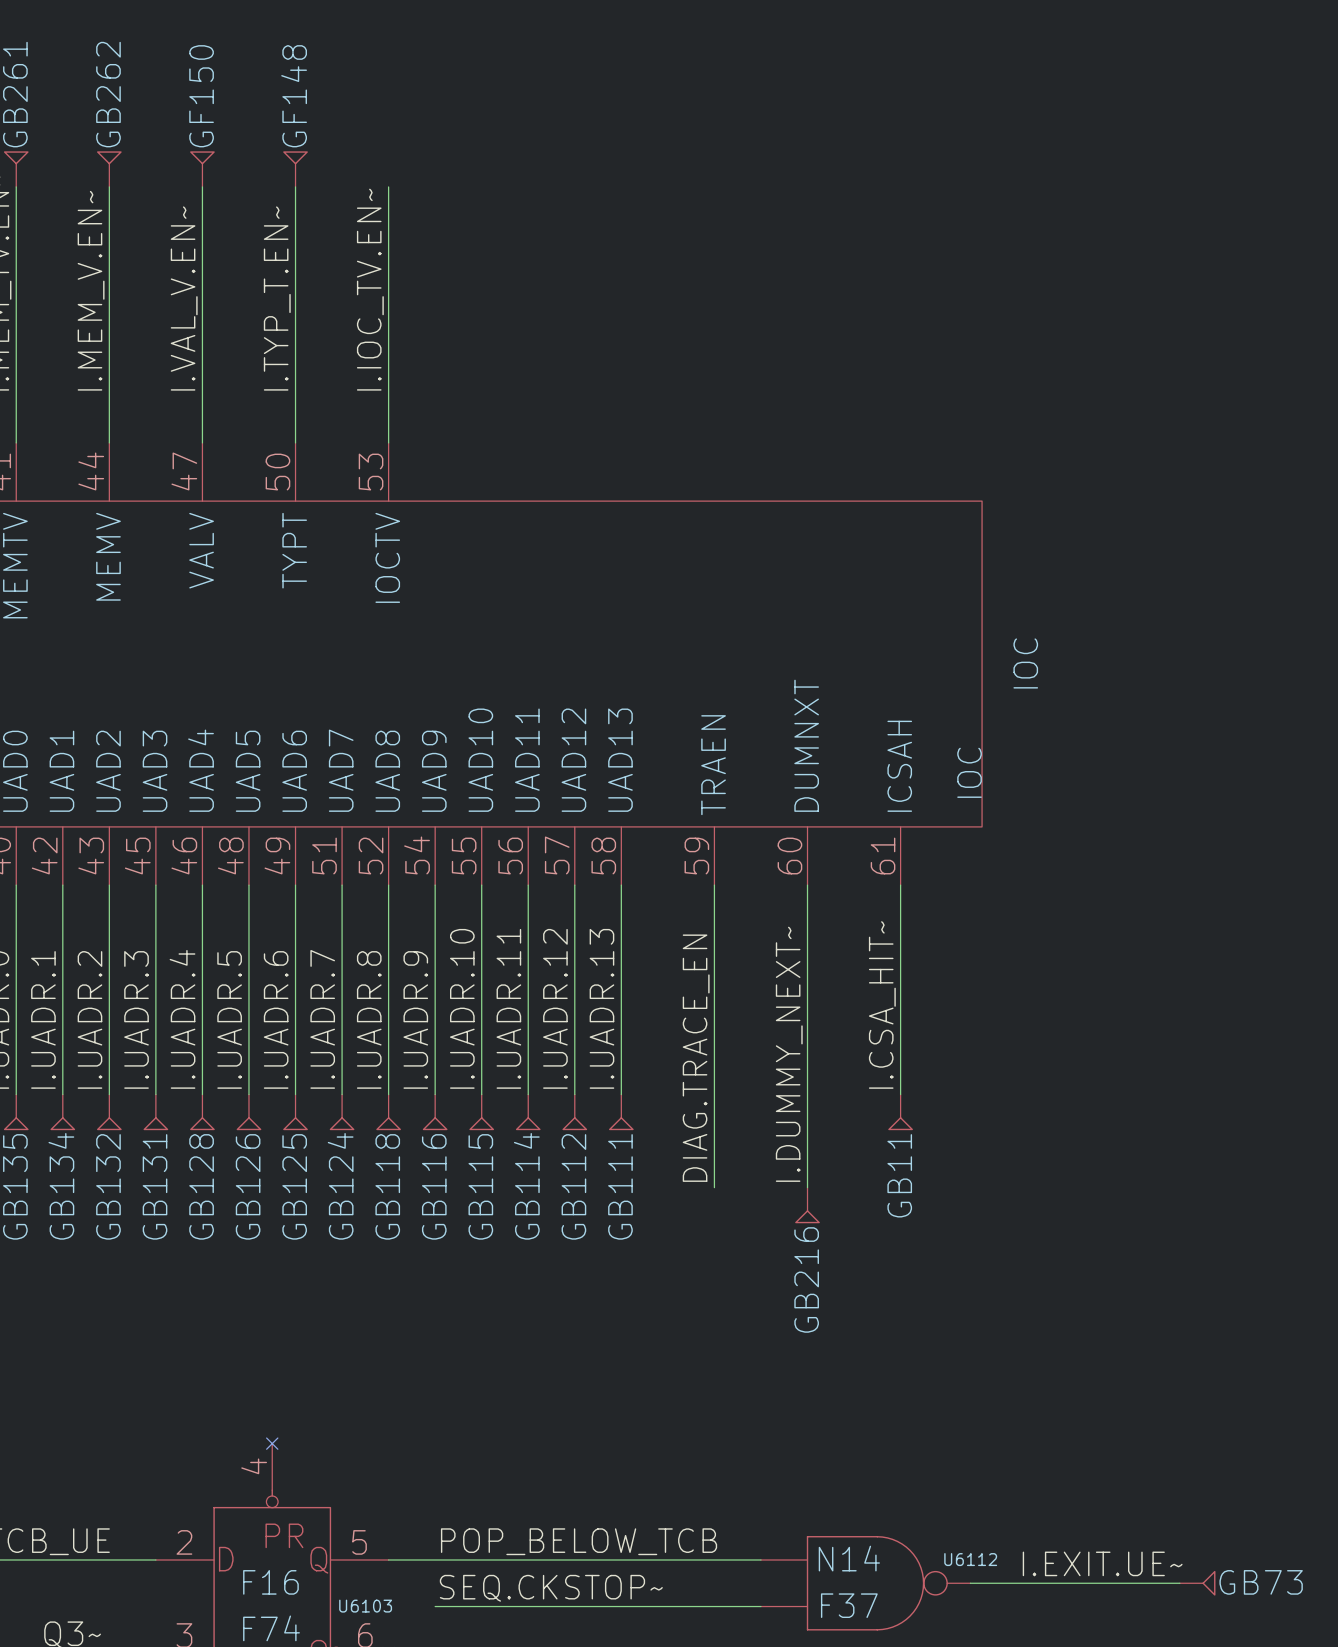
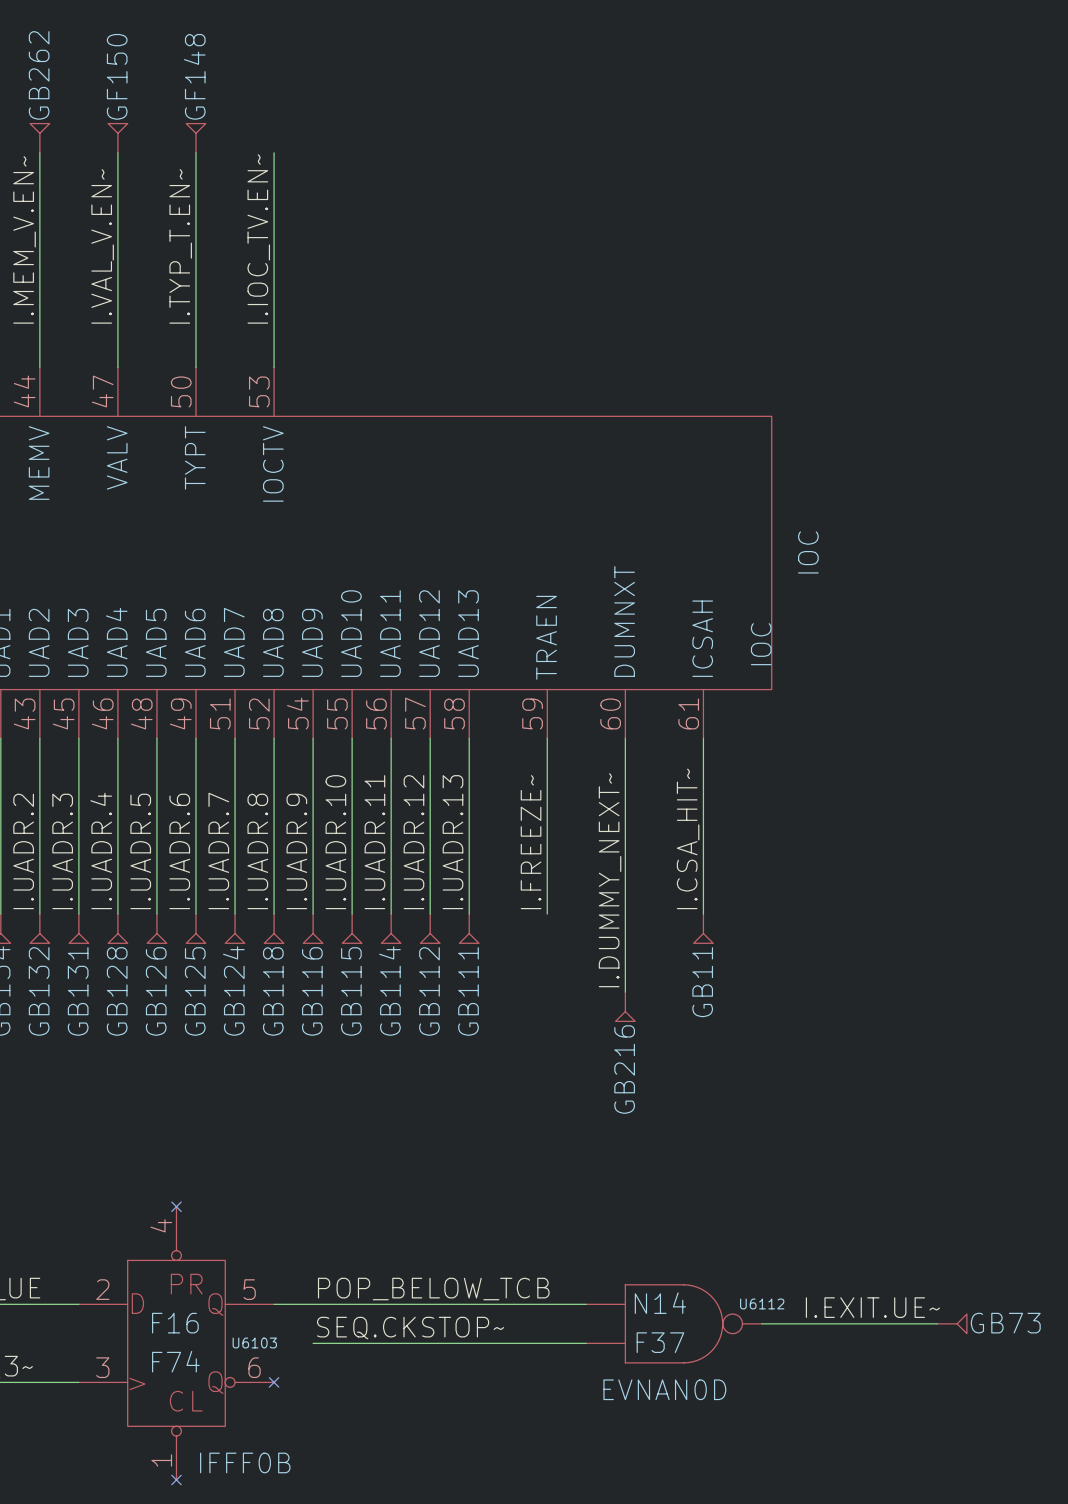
label: none -> I.FREEZE~ (531, 842)
label: DIAG.TRACE_EN (696, 1058) -> none
wire: (714, 1094) (714, 1187) -> none

